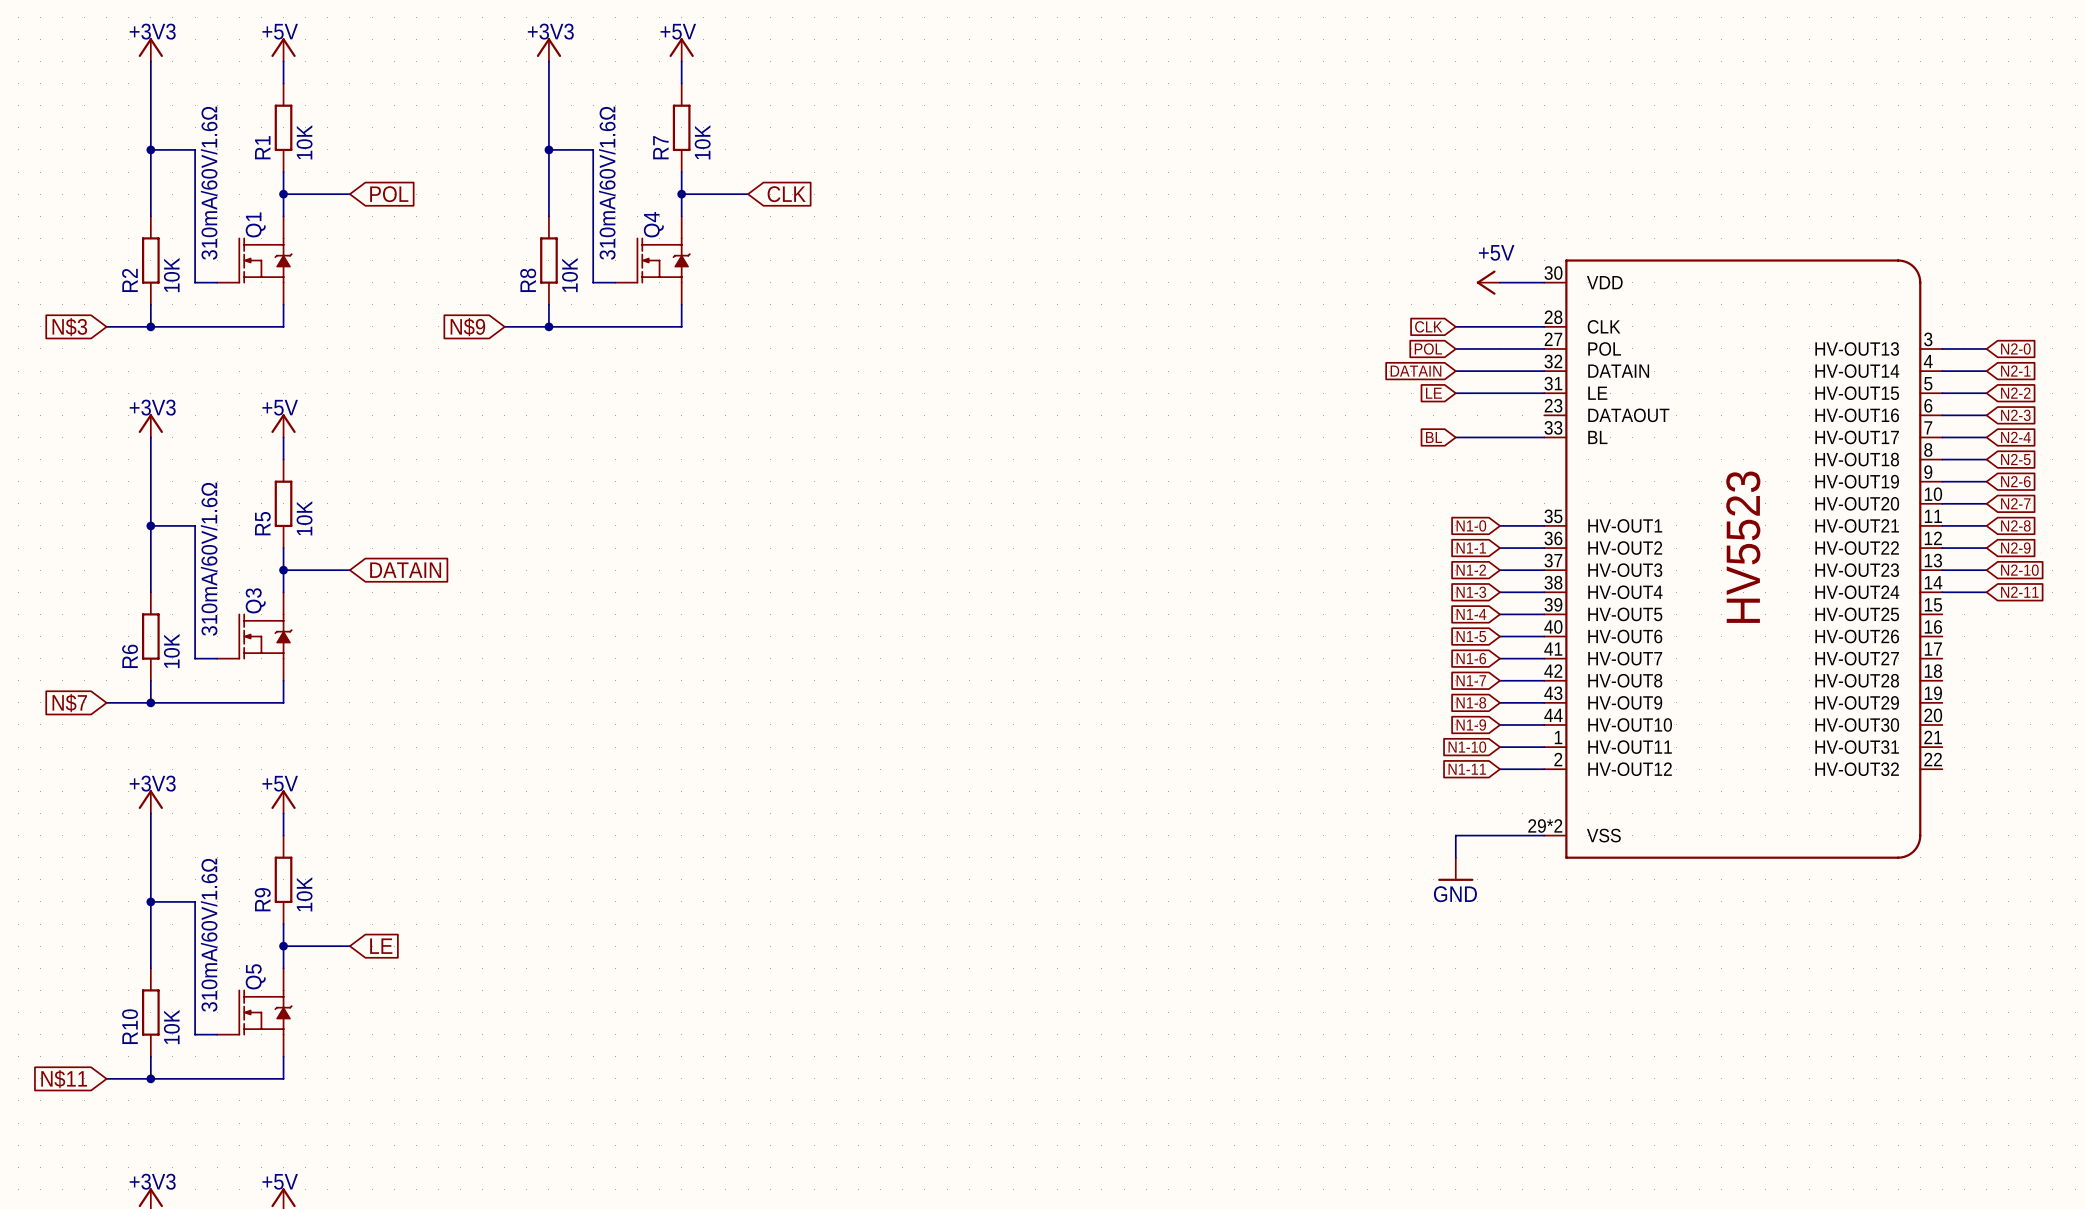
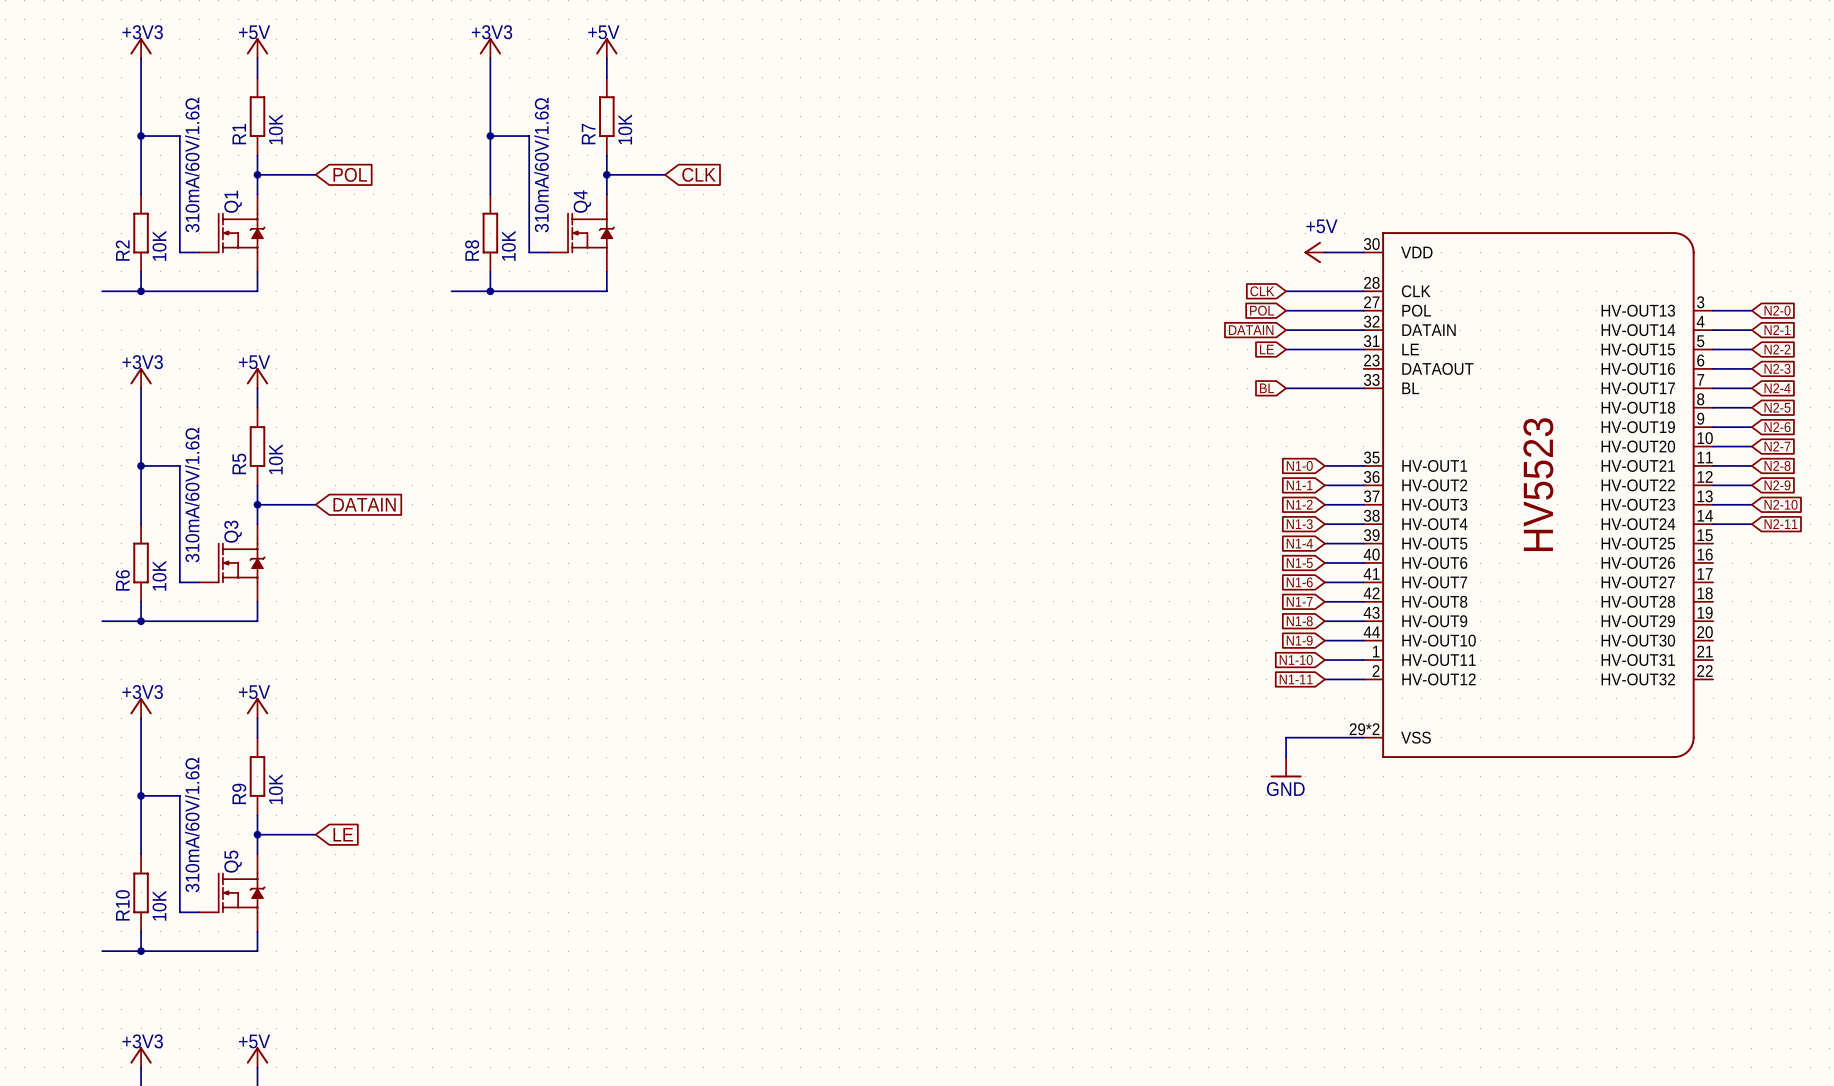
global label: N$3 (69, 327) -> none
global label: N$9 (467, 327) -> none
global label: N$7 (69, 703) -> none
global label: N$11 (64, 1079) -> none

